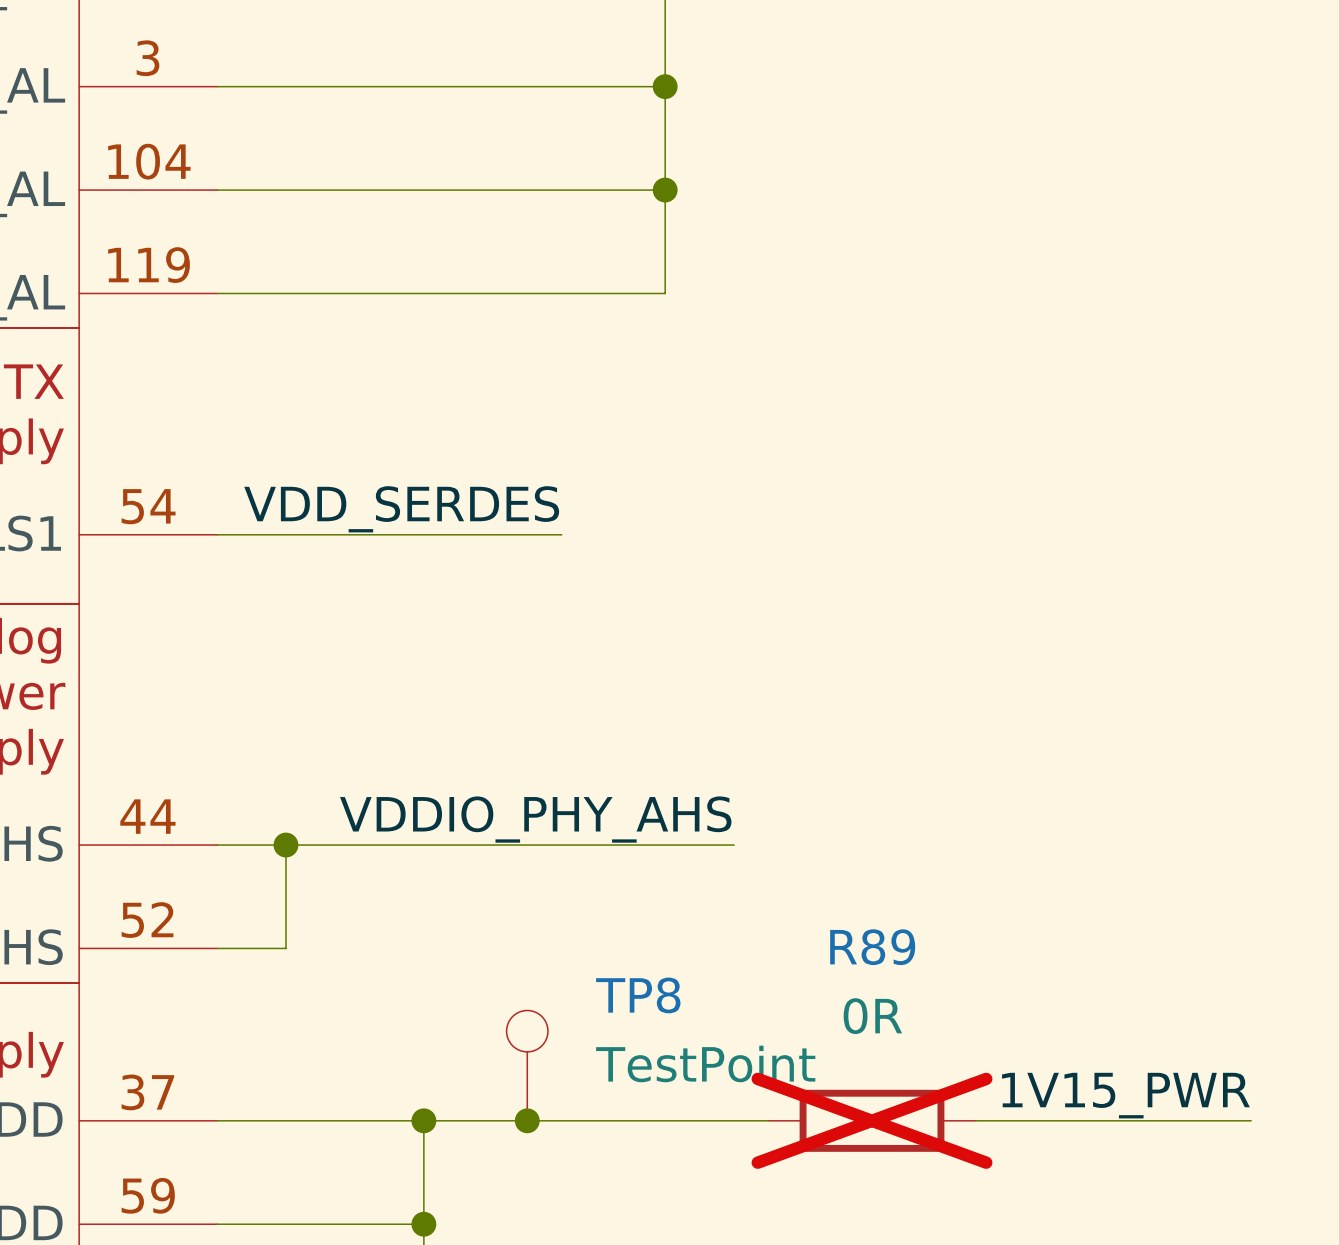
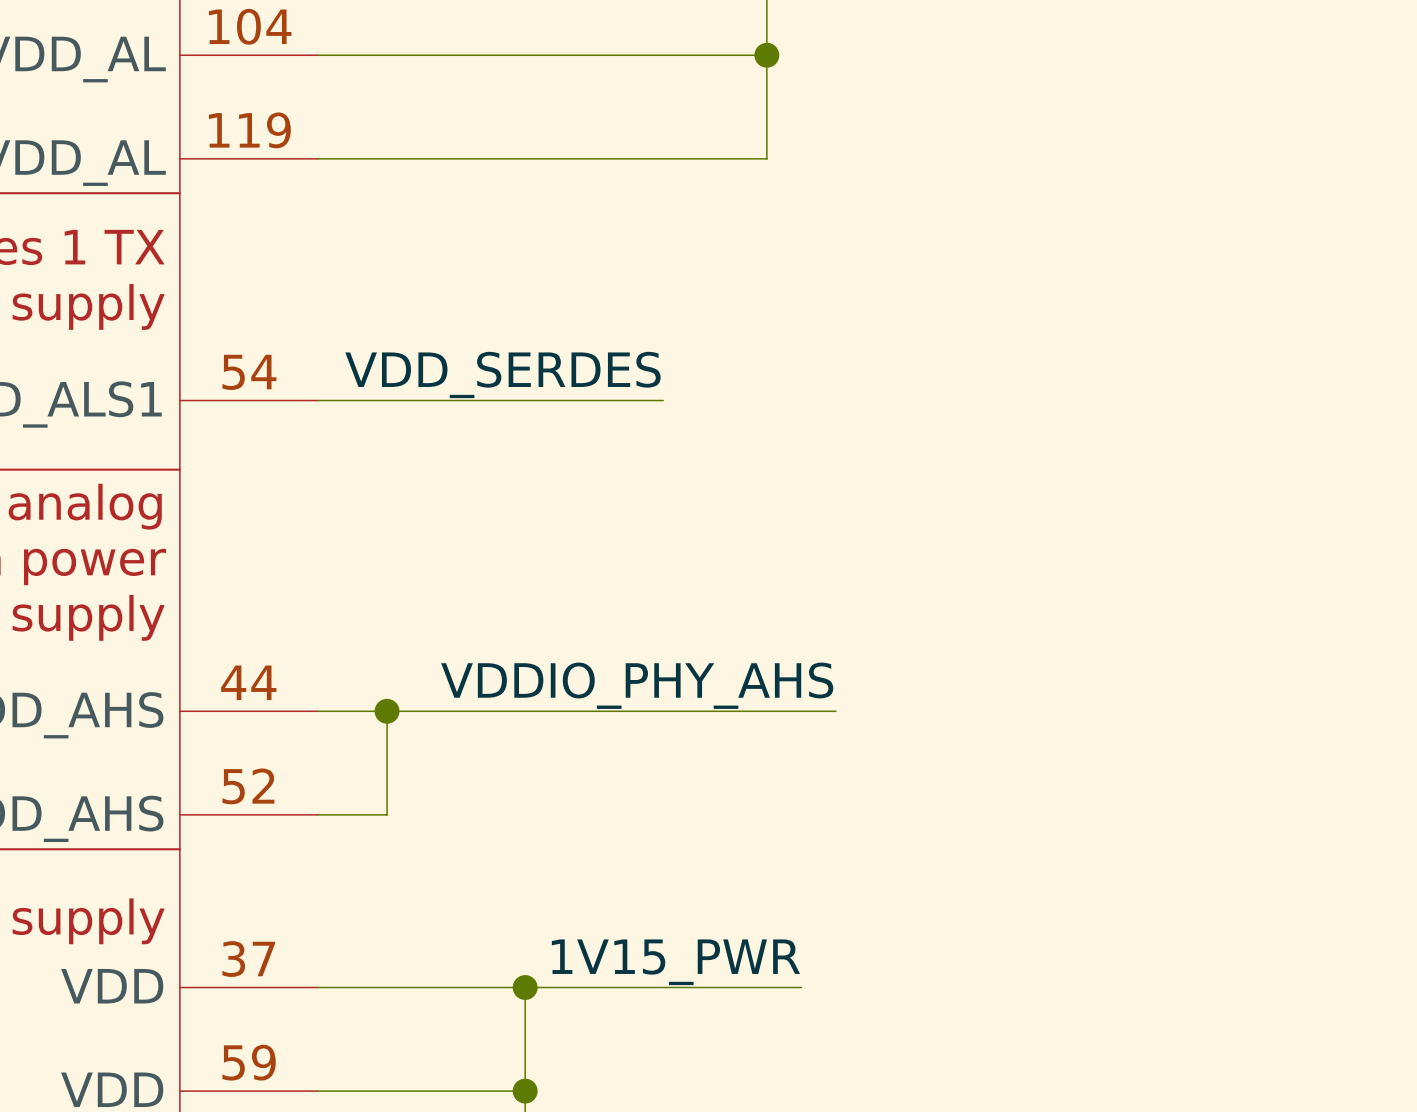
TP8: TestPoint (527, 1065) -> none
label position: 1V15_PWR (1125, 1095) -> 1V15_PWR (675, 962)
junction: (527, 1120) -> none
wire: (699, 1120) (768, 1120) -> none
R89: 0R (872, 1120) -> none
wire: (975, 1120) (1251, 1120) -> none

